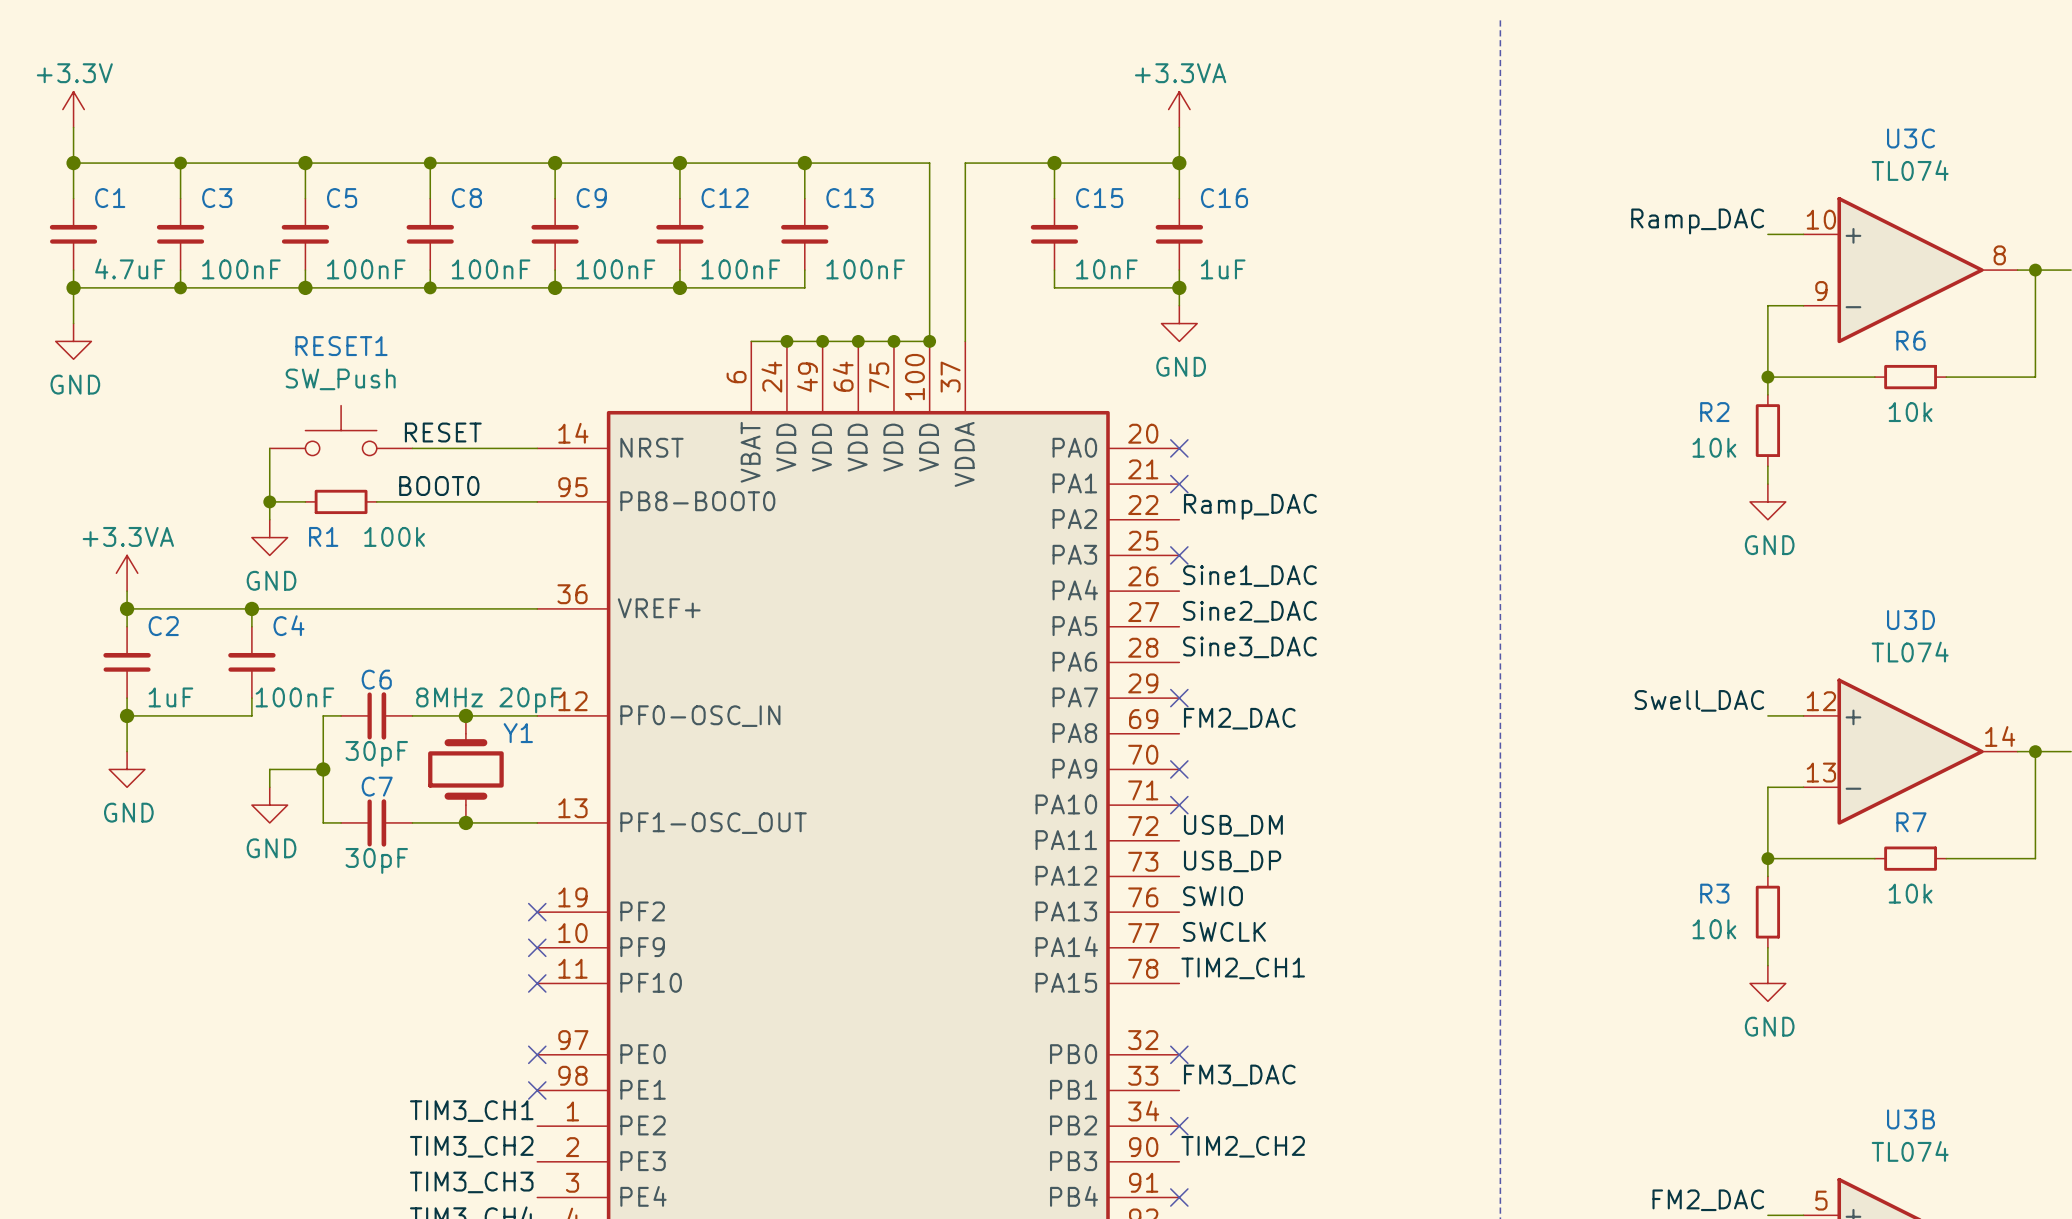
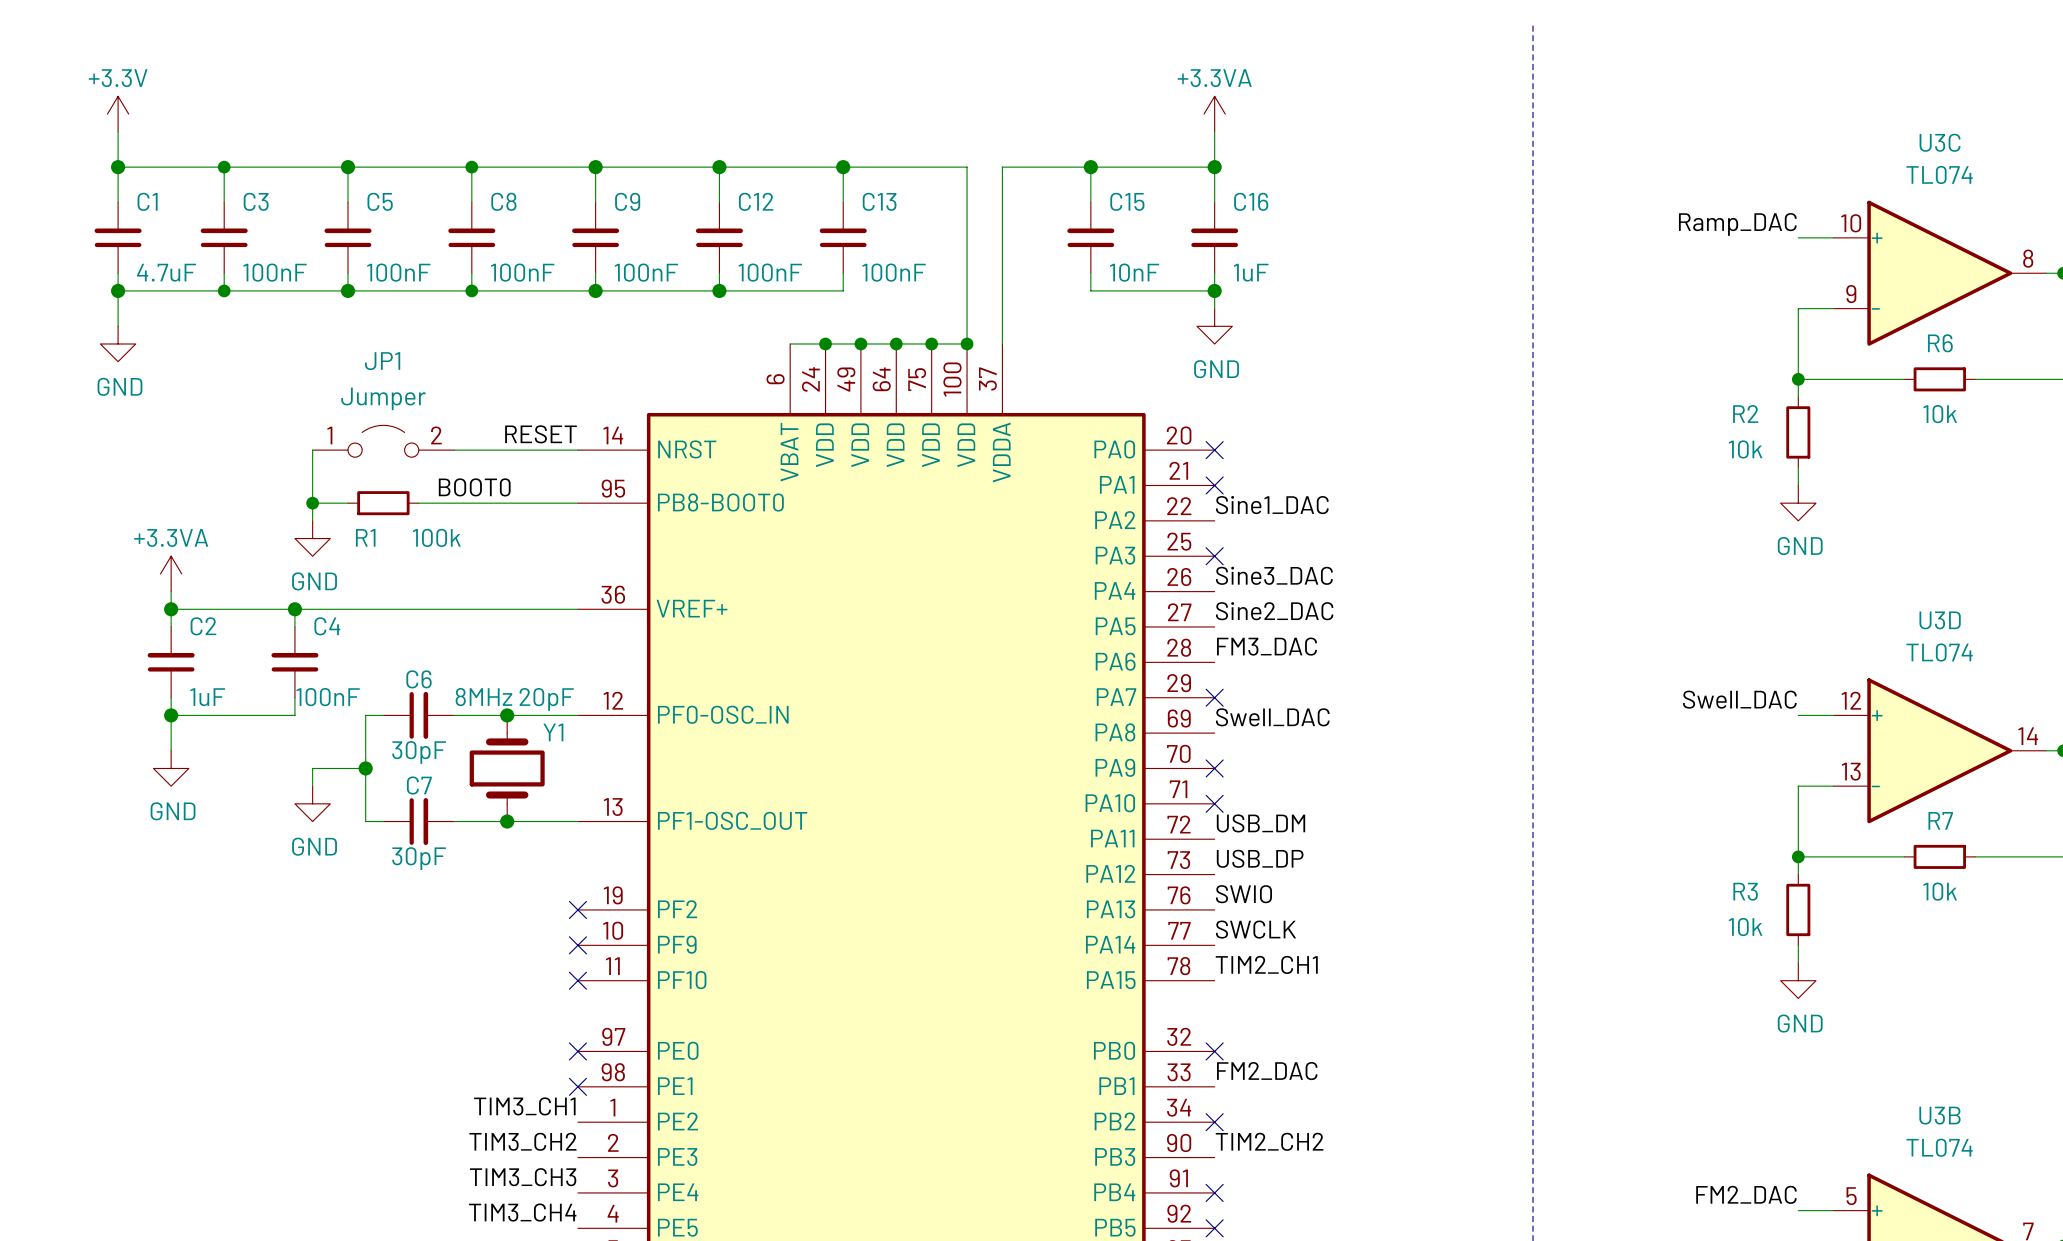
RESET1: SW_Push (341, 430) -> none
label position: RESET (443, 432) -> RESET (540, 434)
JP1: none -> Jumper (383, 441)
label: Ramp_DAC (1250, 506) -> Sine1_DAC (1272, 505)
label: Sine1_DAC (1249, 576) -> Sine3_DAC (1274, 575)
label: Sine3_DAC (1249, 647) -> FM3_DAC (1266, 646)
label: FM2_DAC (1239, 718) -> Swell_DAC (1272, 717)
label: FM3_DAC (1239, 1075) -> FM2_DAC (1267, 1071)

